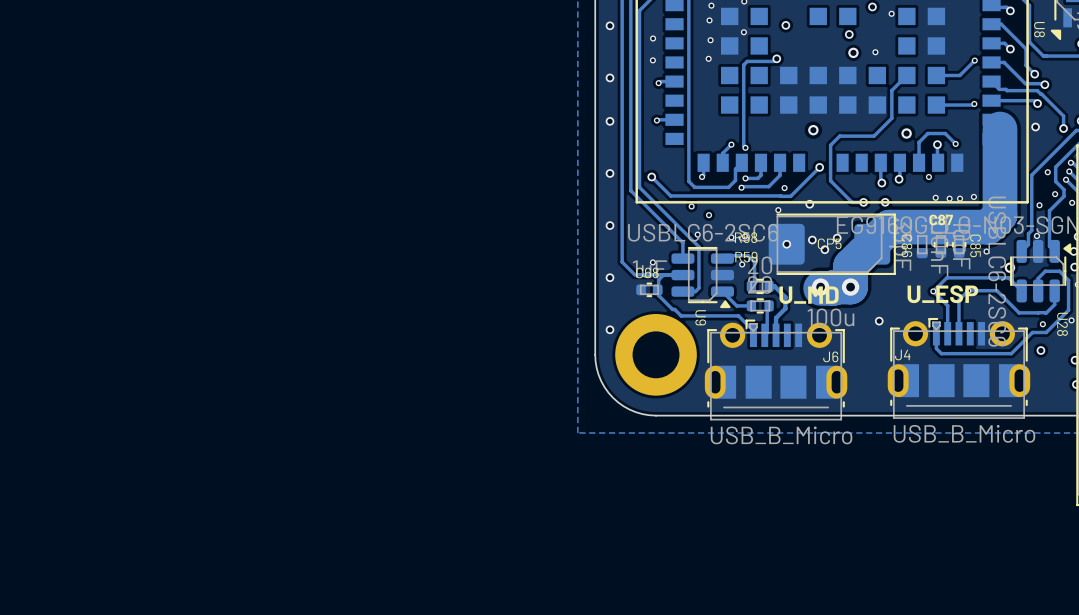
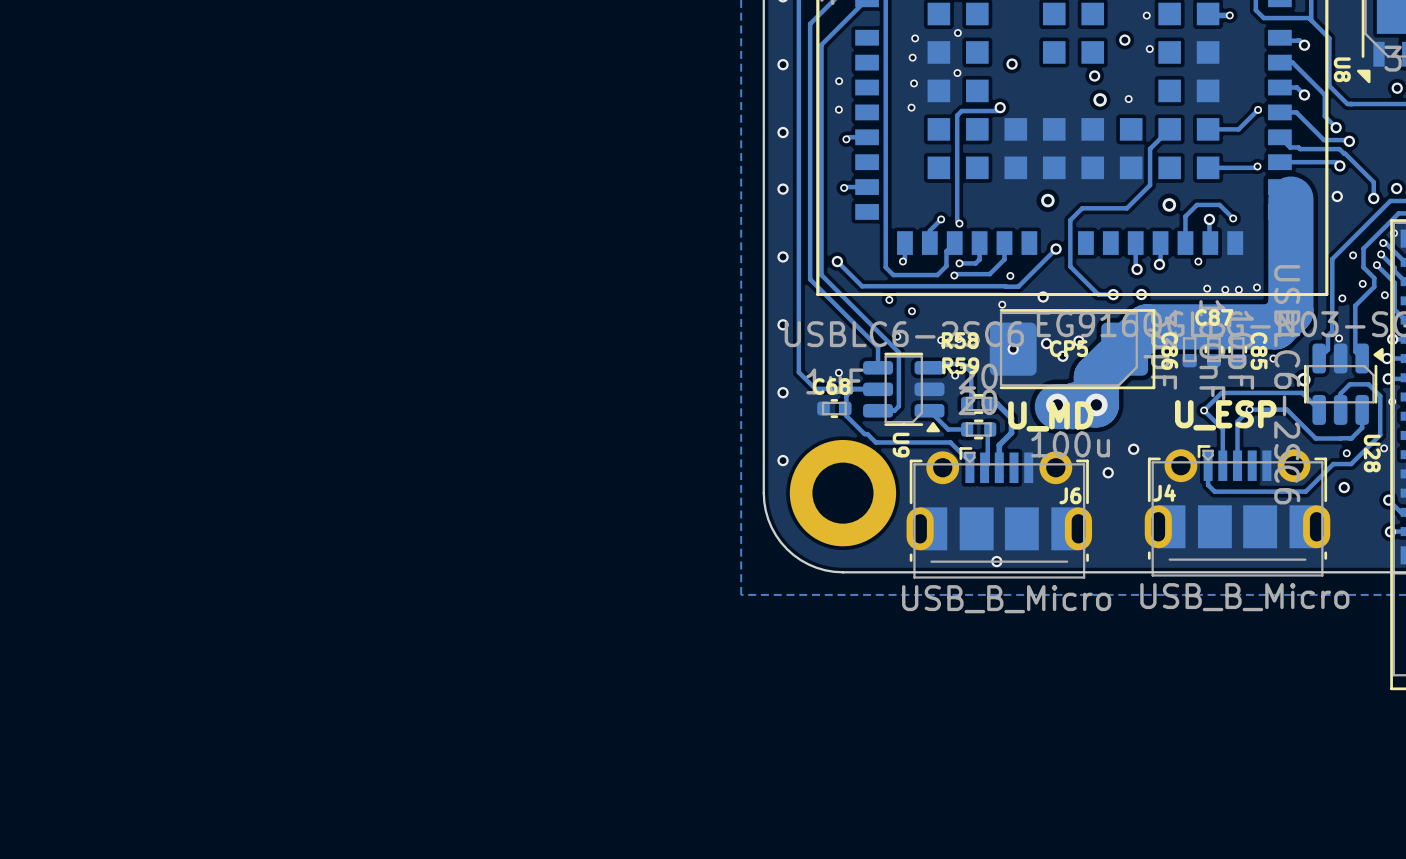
via: none -> (1108, 472)
via: none -> (996, 561)

